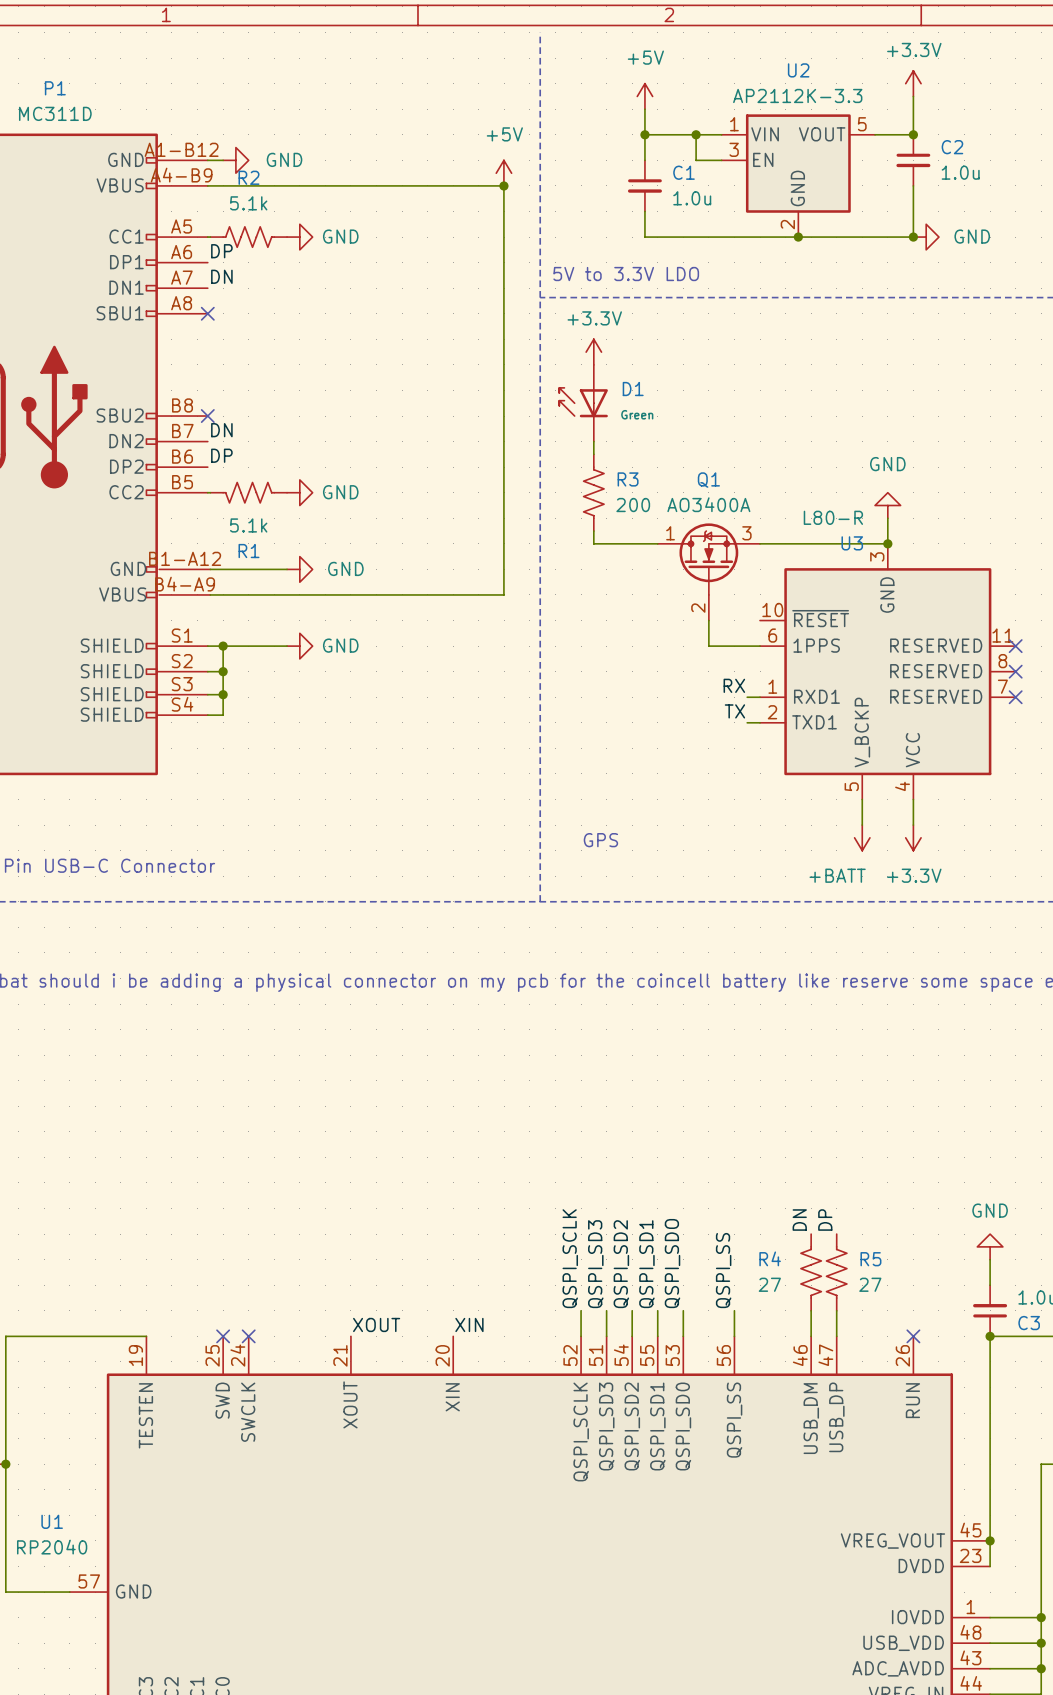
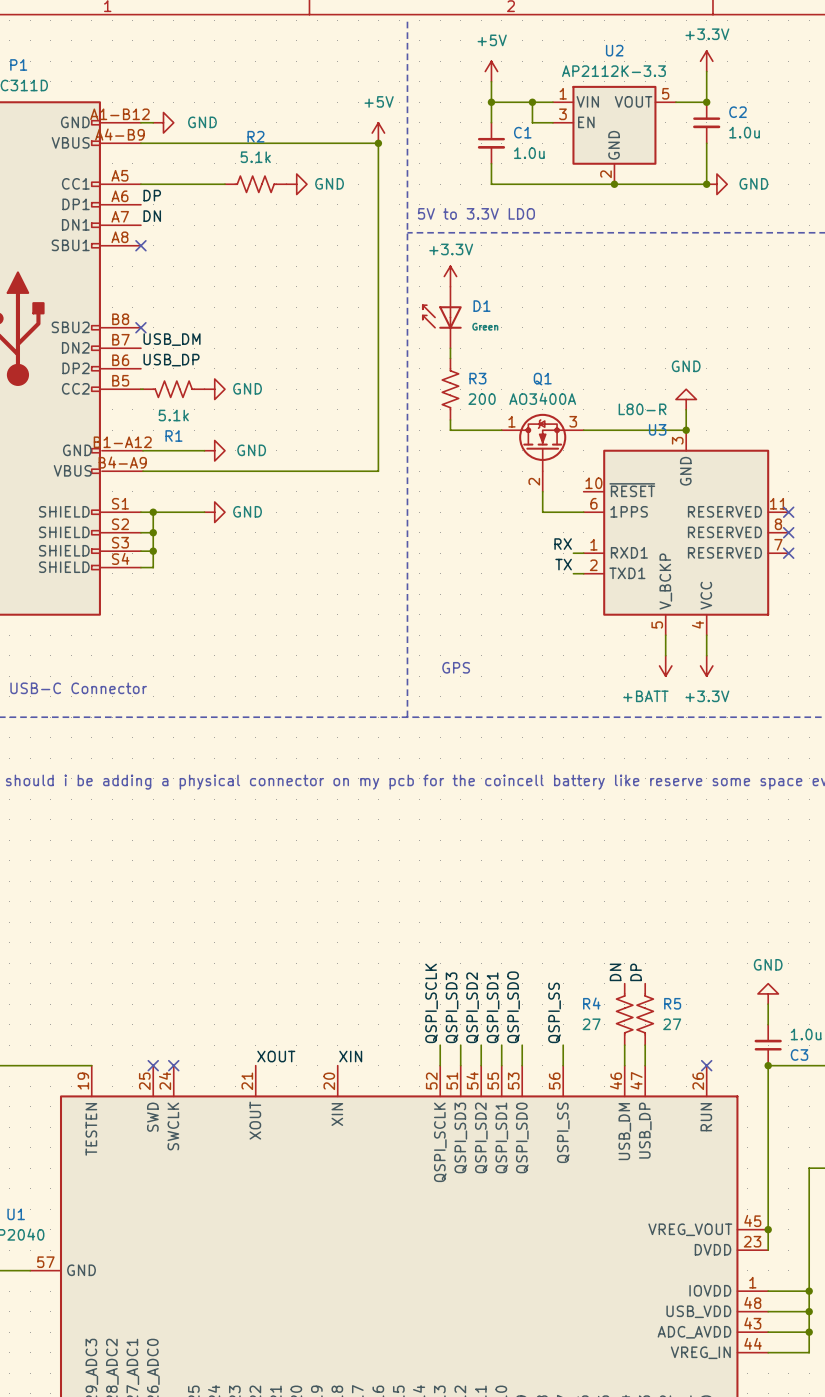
R2 position: (248, 237) -> (255, 184)
power symbol position: GND (299, 237) -> GND (296, 184)
label: DN (221, 430) -> USB_DM (172, 339)
label: DP (221, 455) -> USB_DP (171, 360)

